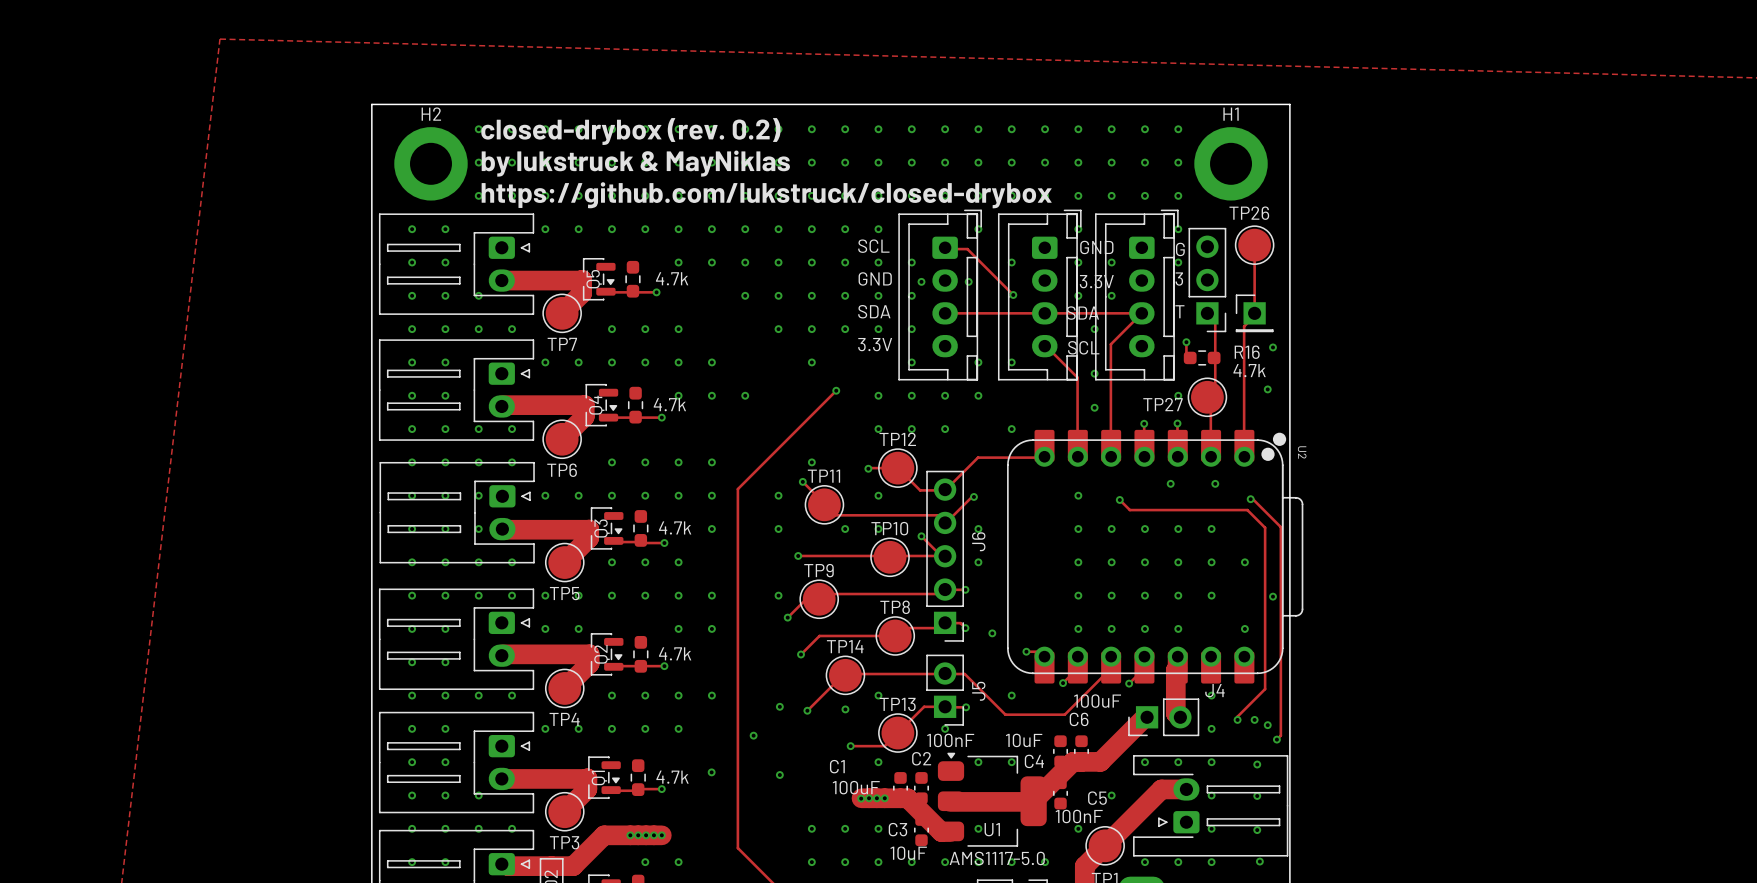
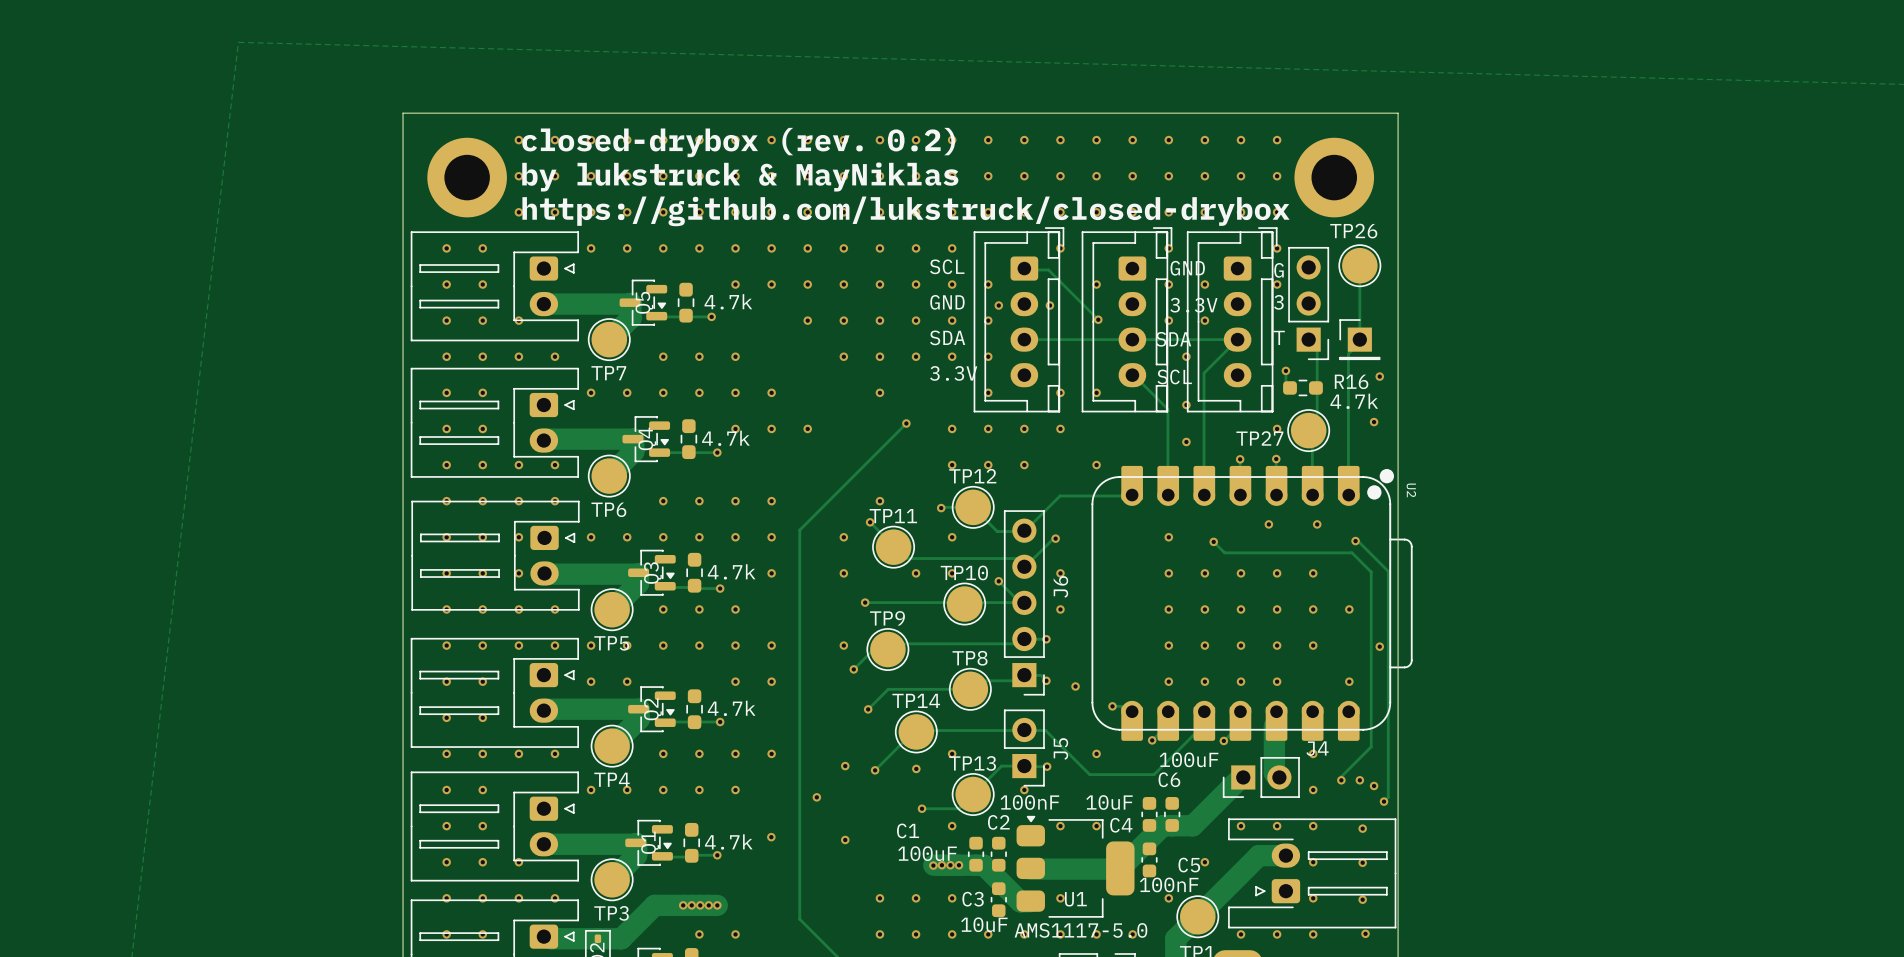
H2 name: H2 (431, 114) -> none
H1 name: H1 (1231, 114) -> none

